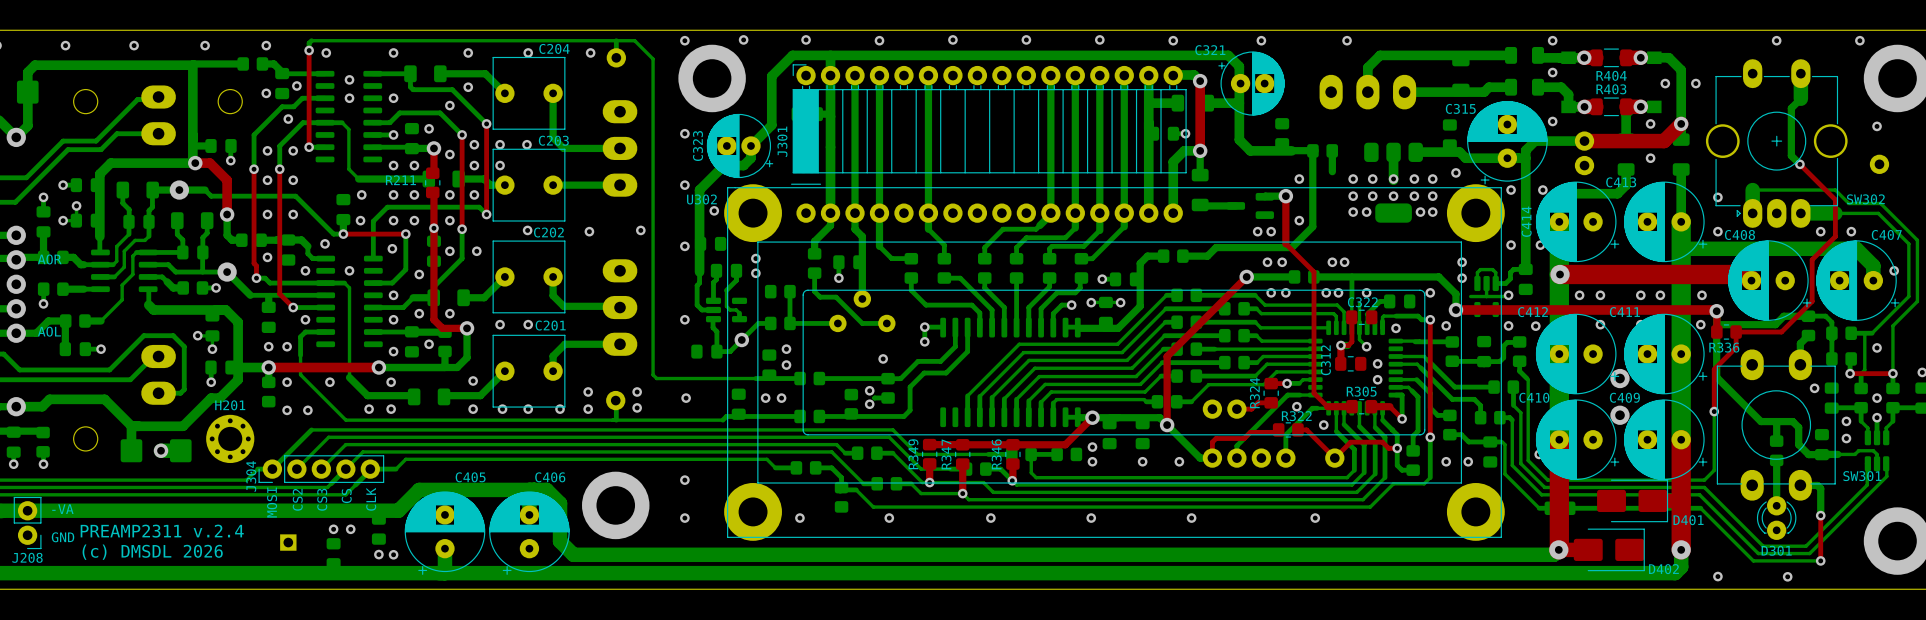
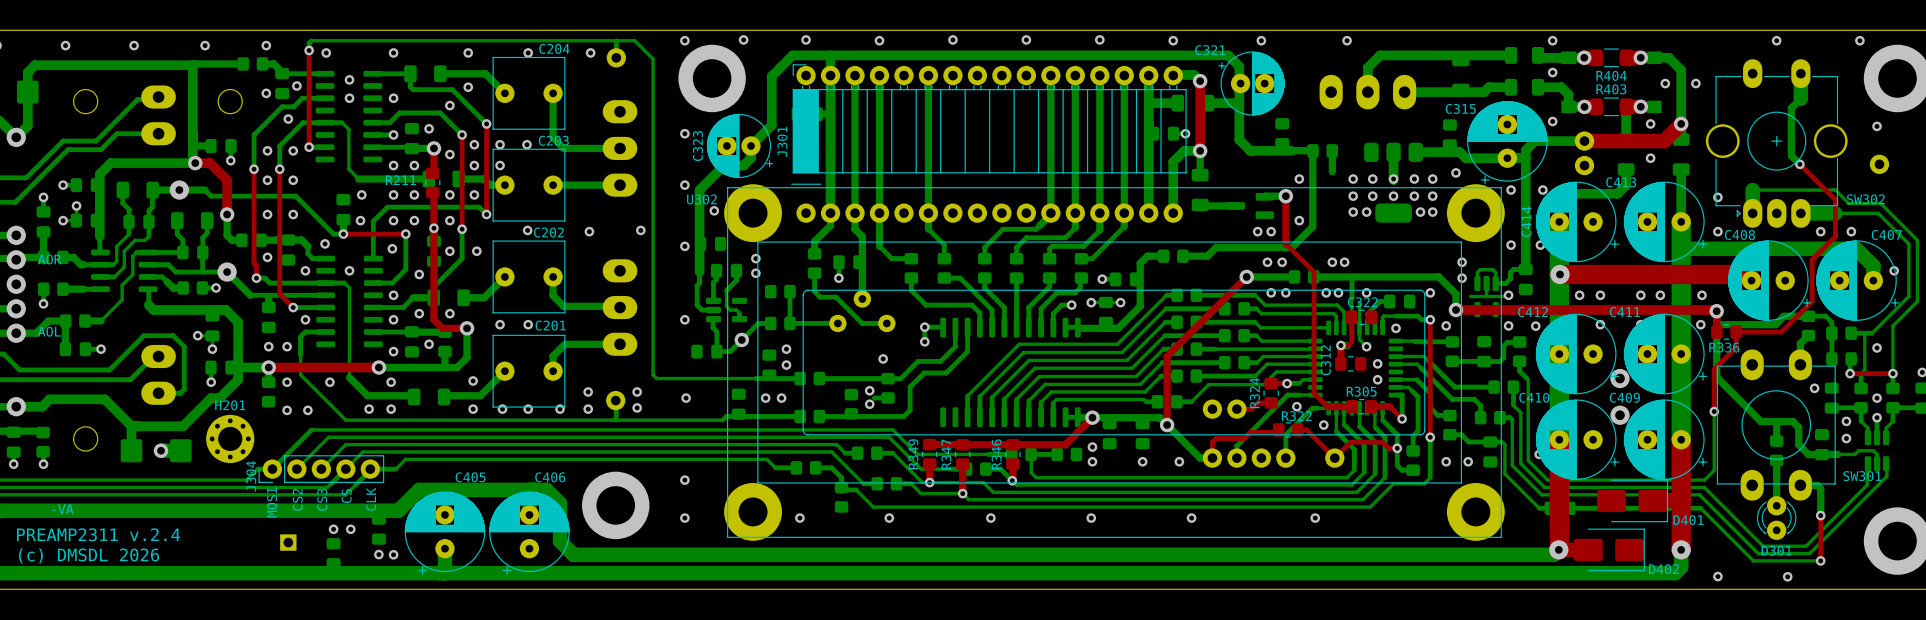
J208: (27, 523) -> none
text position: PREAMP2311 v.2.4 (162, 531) -> PREAMP2311 v.2.4 (98, 534)
text: GND (63, 537) -> none
text position: (c) DMSDL 2026 (152, 552) -> (c) DMSDL 2026 (89, 555)

